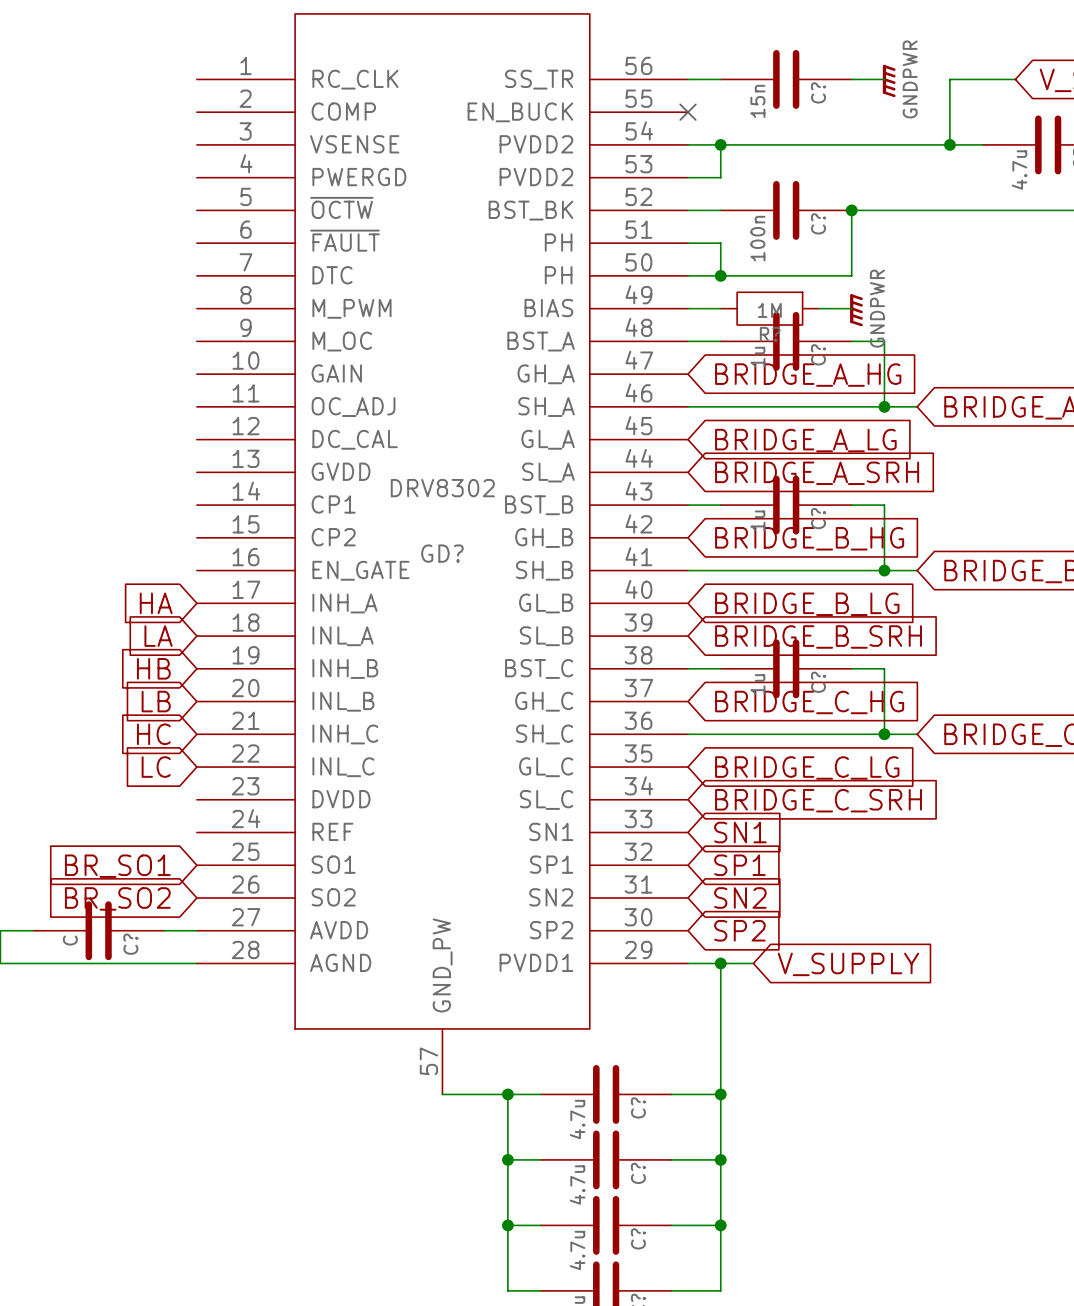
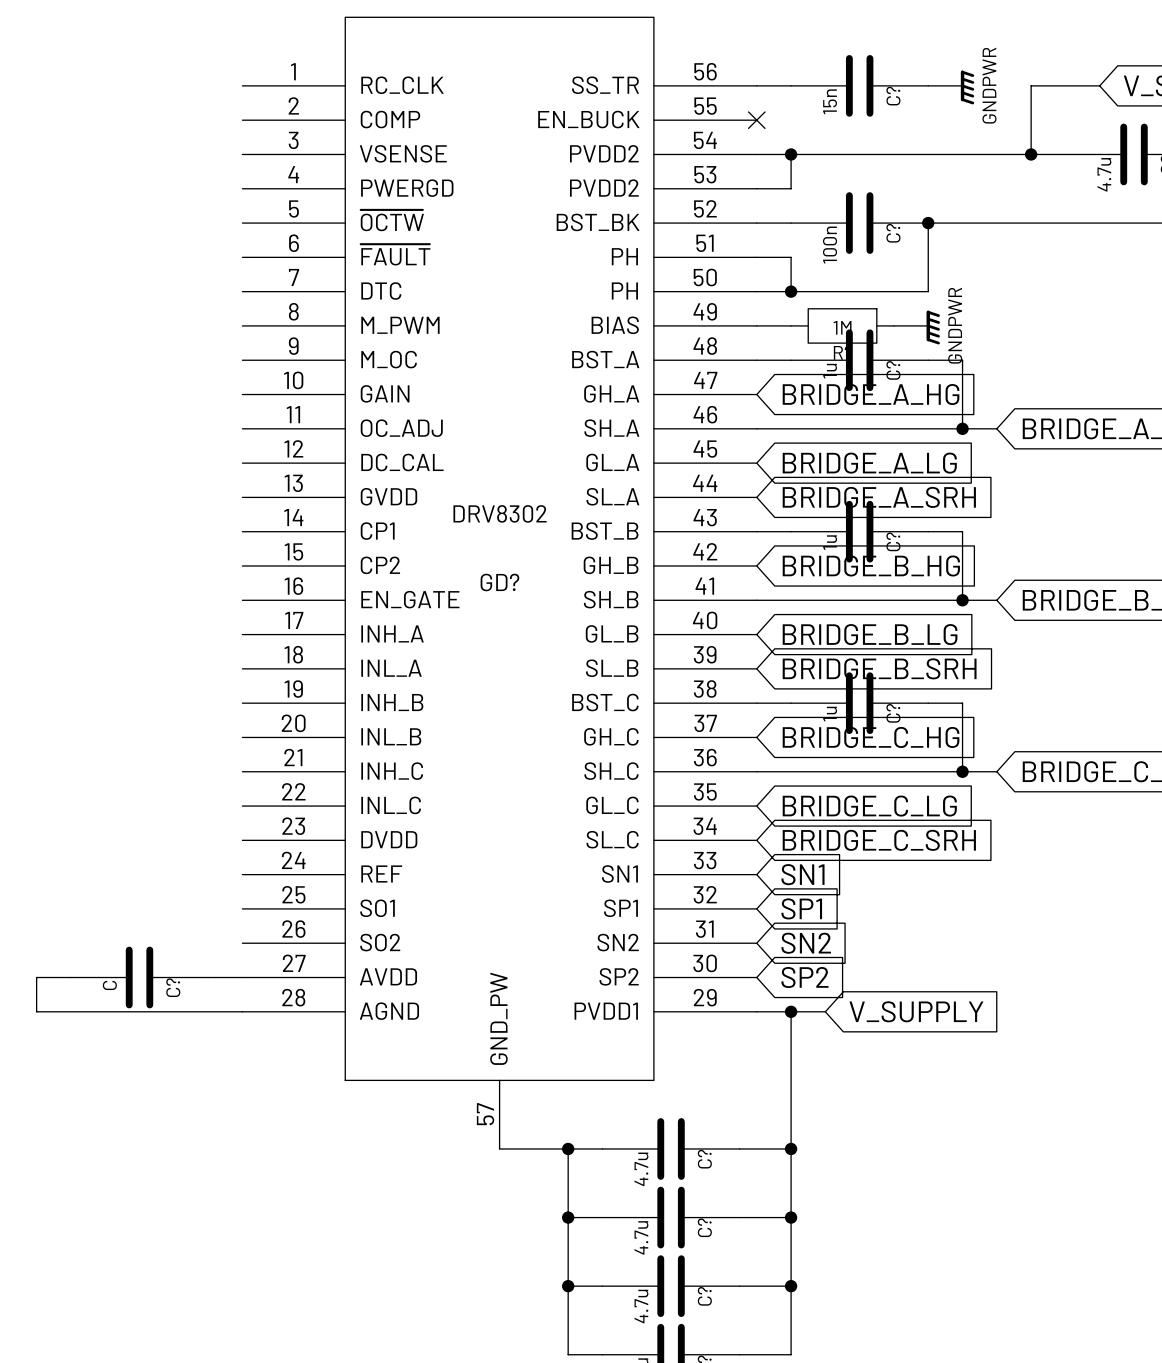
global label: HA (156, 603) -> none
global label: LA (158, 636) -> none
global label: HB (153, 668) -> none
global label: LB (156, 701) -> none
global label: HC (153, 734) -> none
global label: LC (156, 767) -> none
global label: BR_SO1 (117, 866) -> none
global label: BR_SO2 (117, 898) -> none

